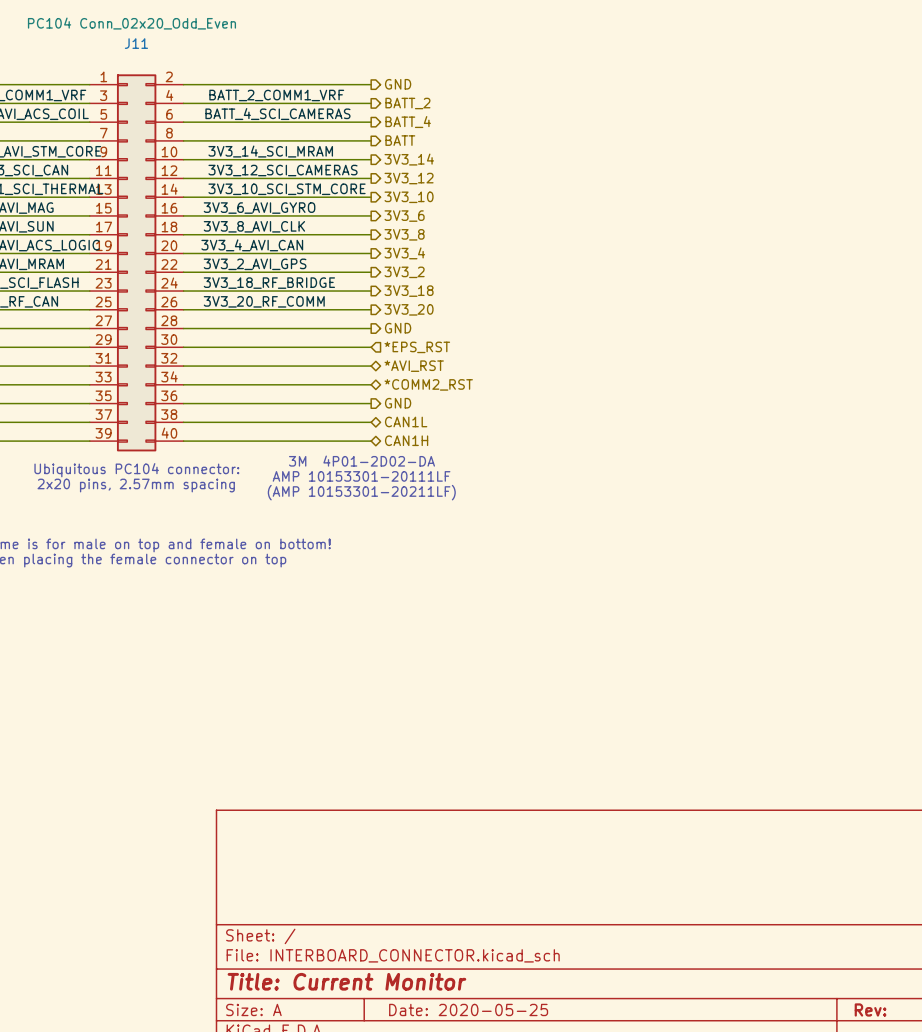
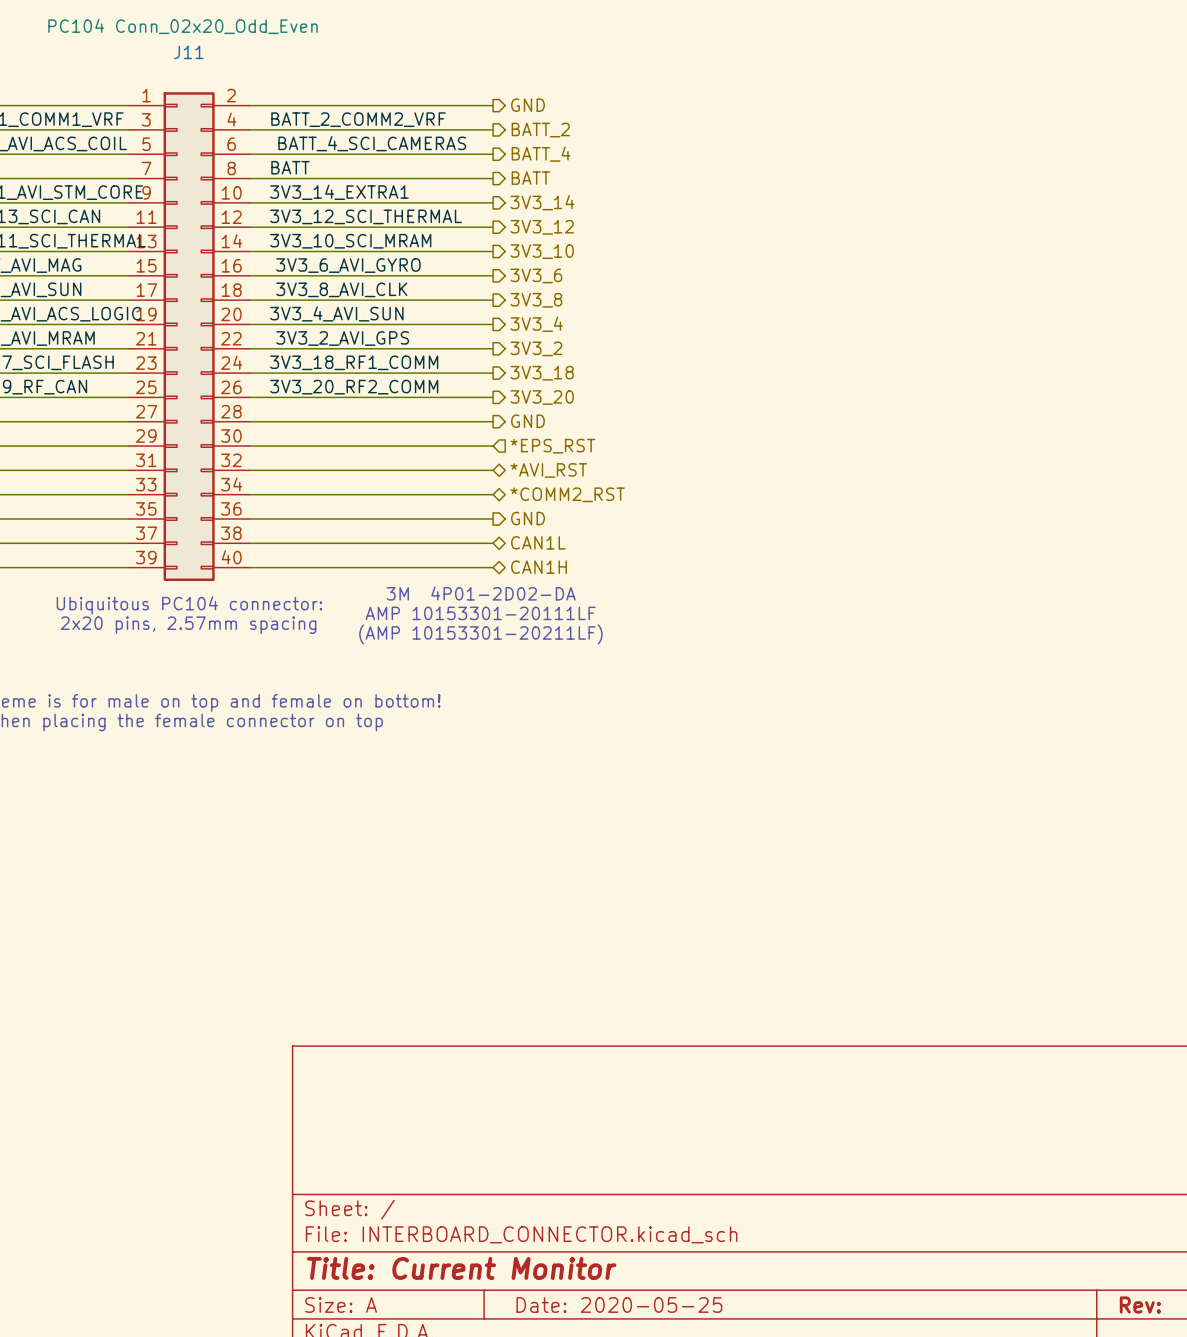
label: BATT_2_COMM1_VRF (276, 95) -> BATT_2_COMM2_VRF (358, 119)
label: none -> BATT (290, 167)
label: 3V3_14_SCI_MRAM (270, 151) -> 3V3_14_EXTRA1 (339, 192)
label: 3V3_12_SCI_CAMERAS (283, 170) -> 3V3_12_SCI_THERMAL (366, 216)
label: 3V3_10_SCI_STM_CORE (287, 189) -> 3V3_10_SCI_MRAM (350, 241)
label: 3V3_4_AVI_CAN (252, 245) -> 3V3_4_AVI_SUN (336, 313)
label: 3V3_18_RF_BRIDGE (269, 283) -> 3V3_18_RF1_COMM (354, 362)
label: 3V3_20_RF_COMM (264, 301) -> 3V3_20_RF2_COMM (354, 387)

